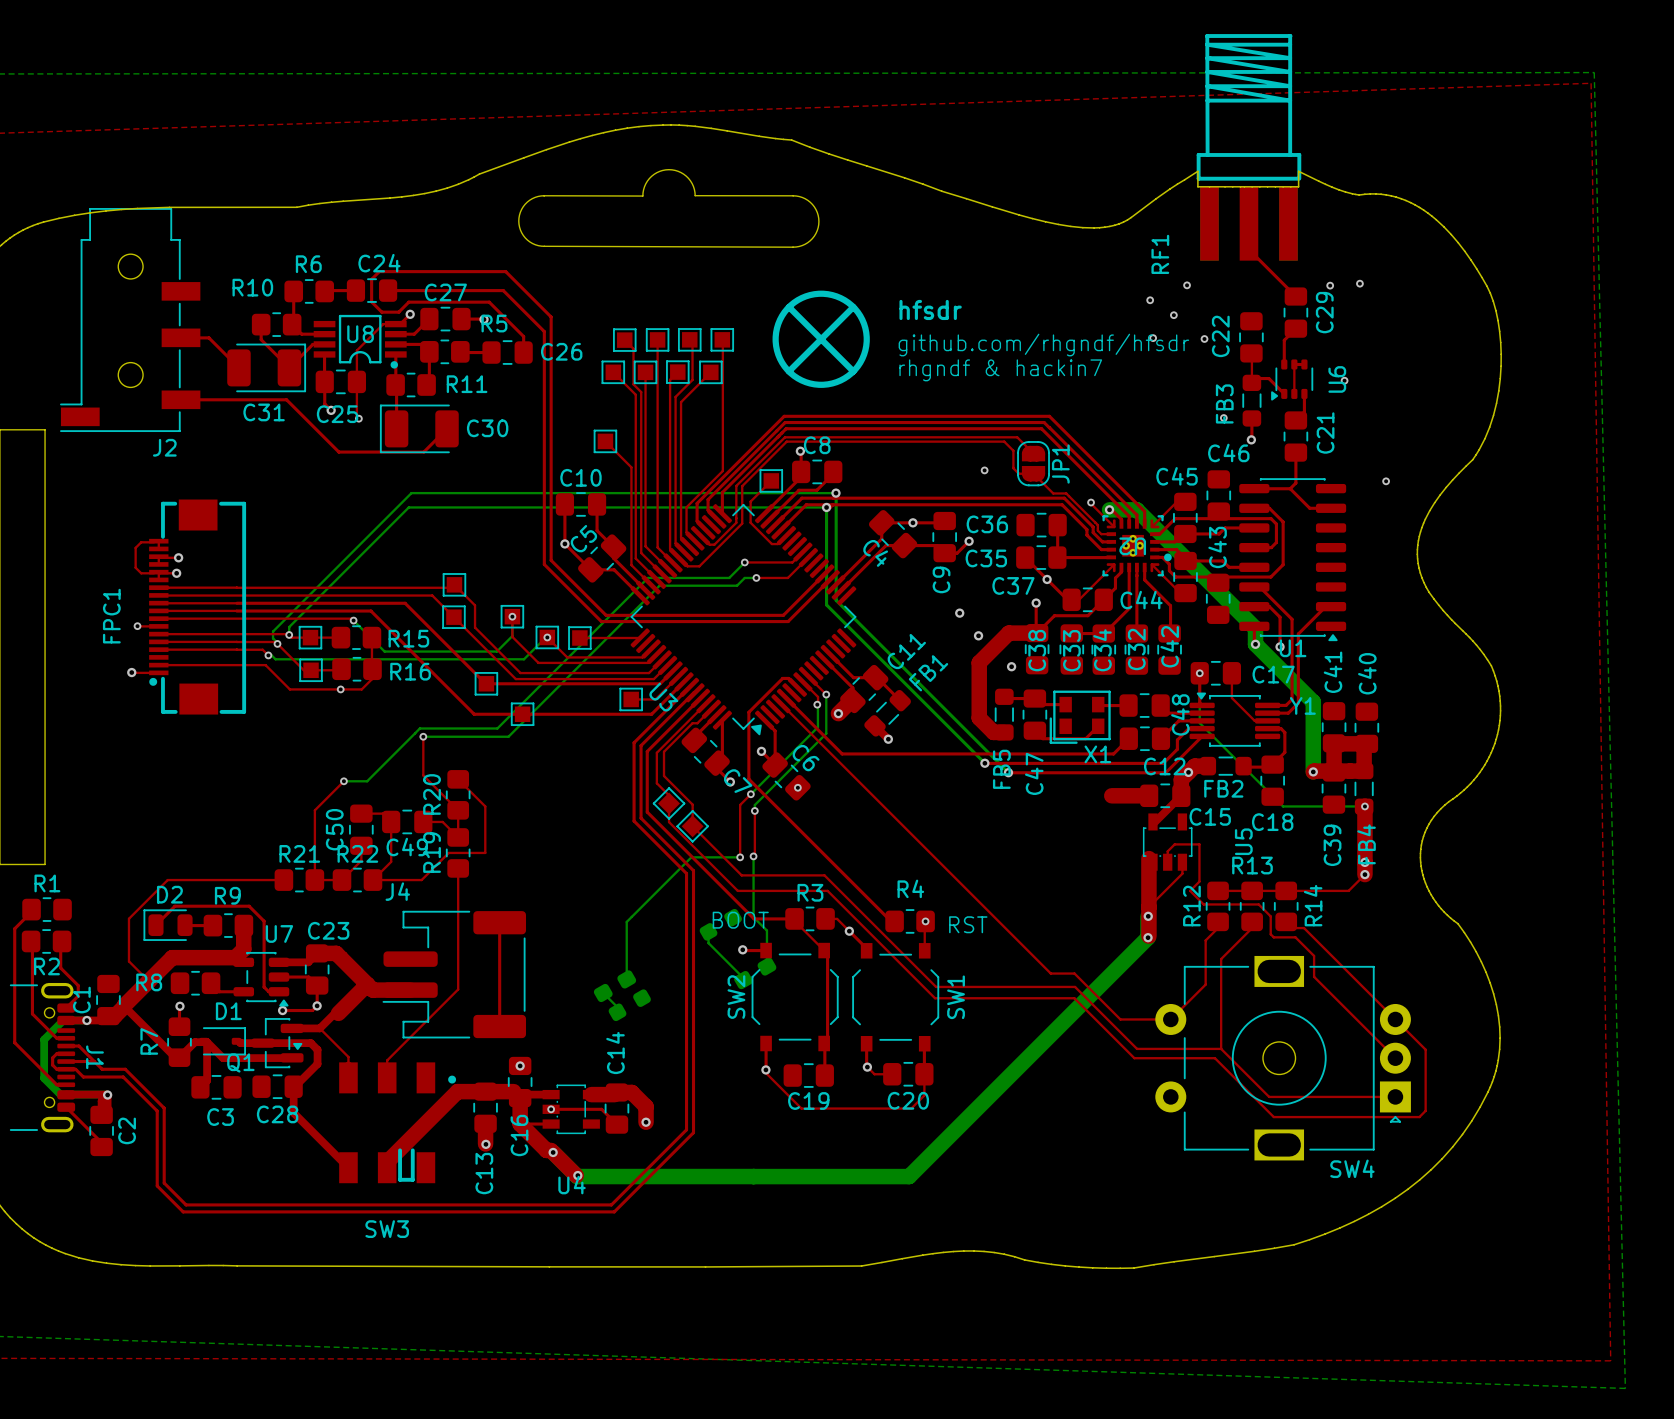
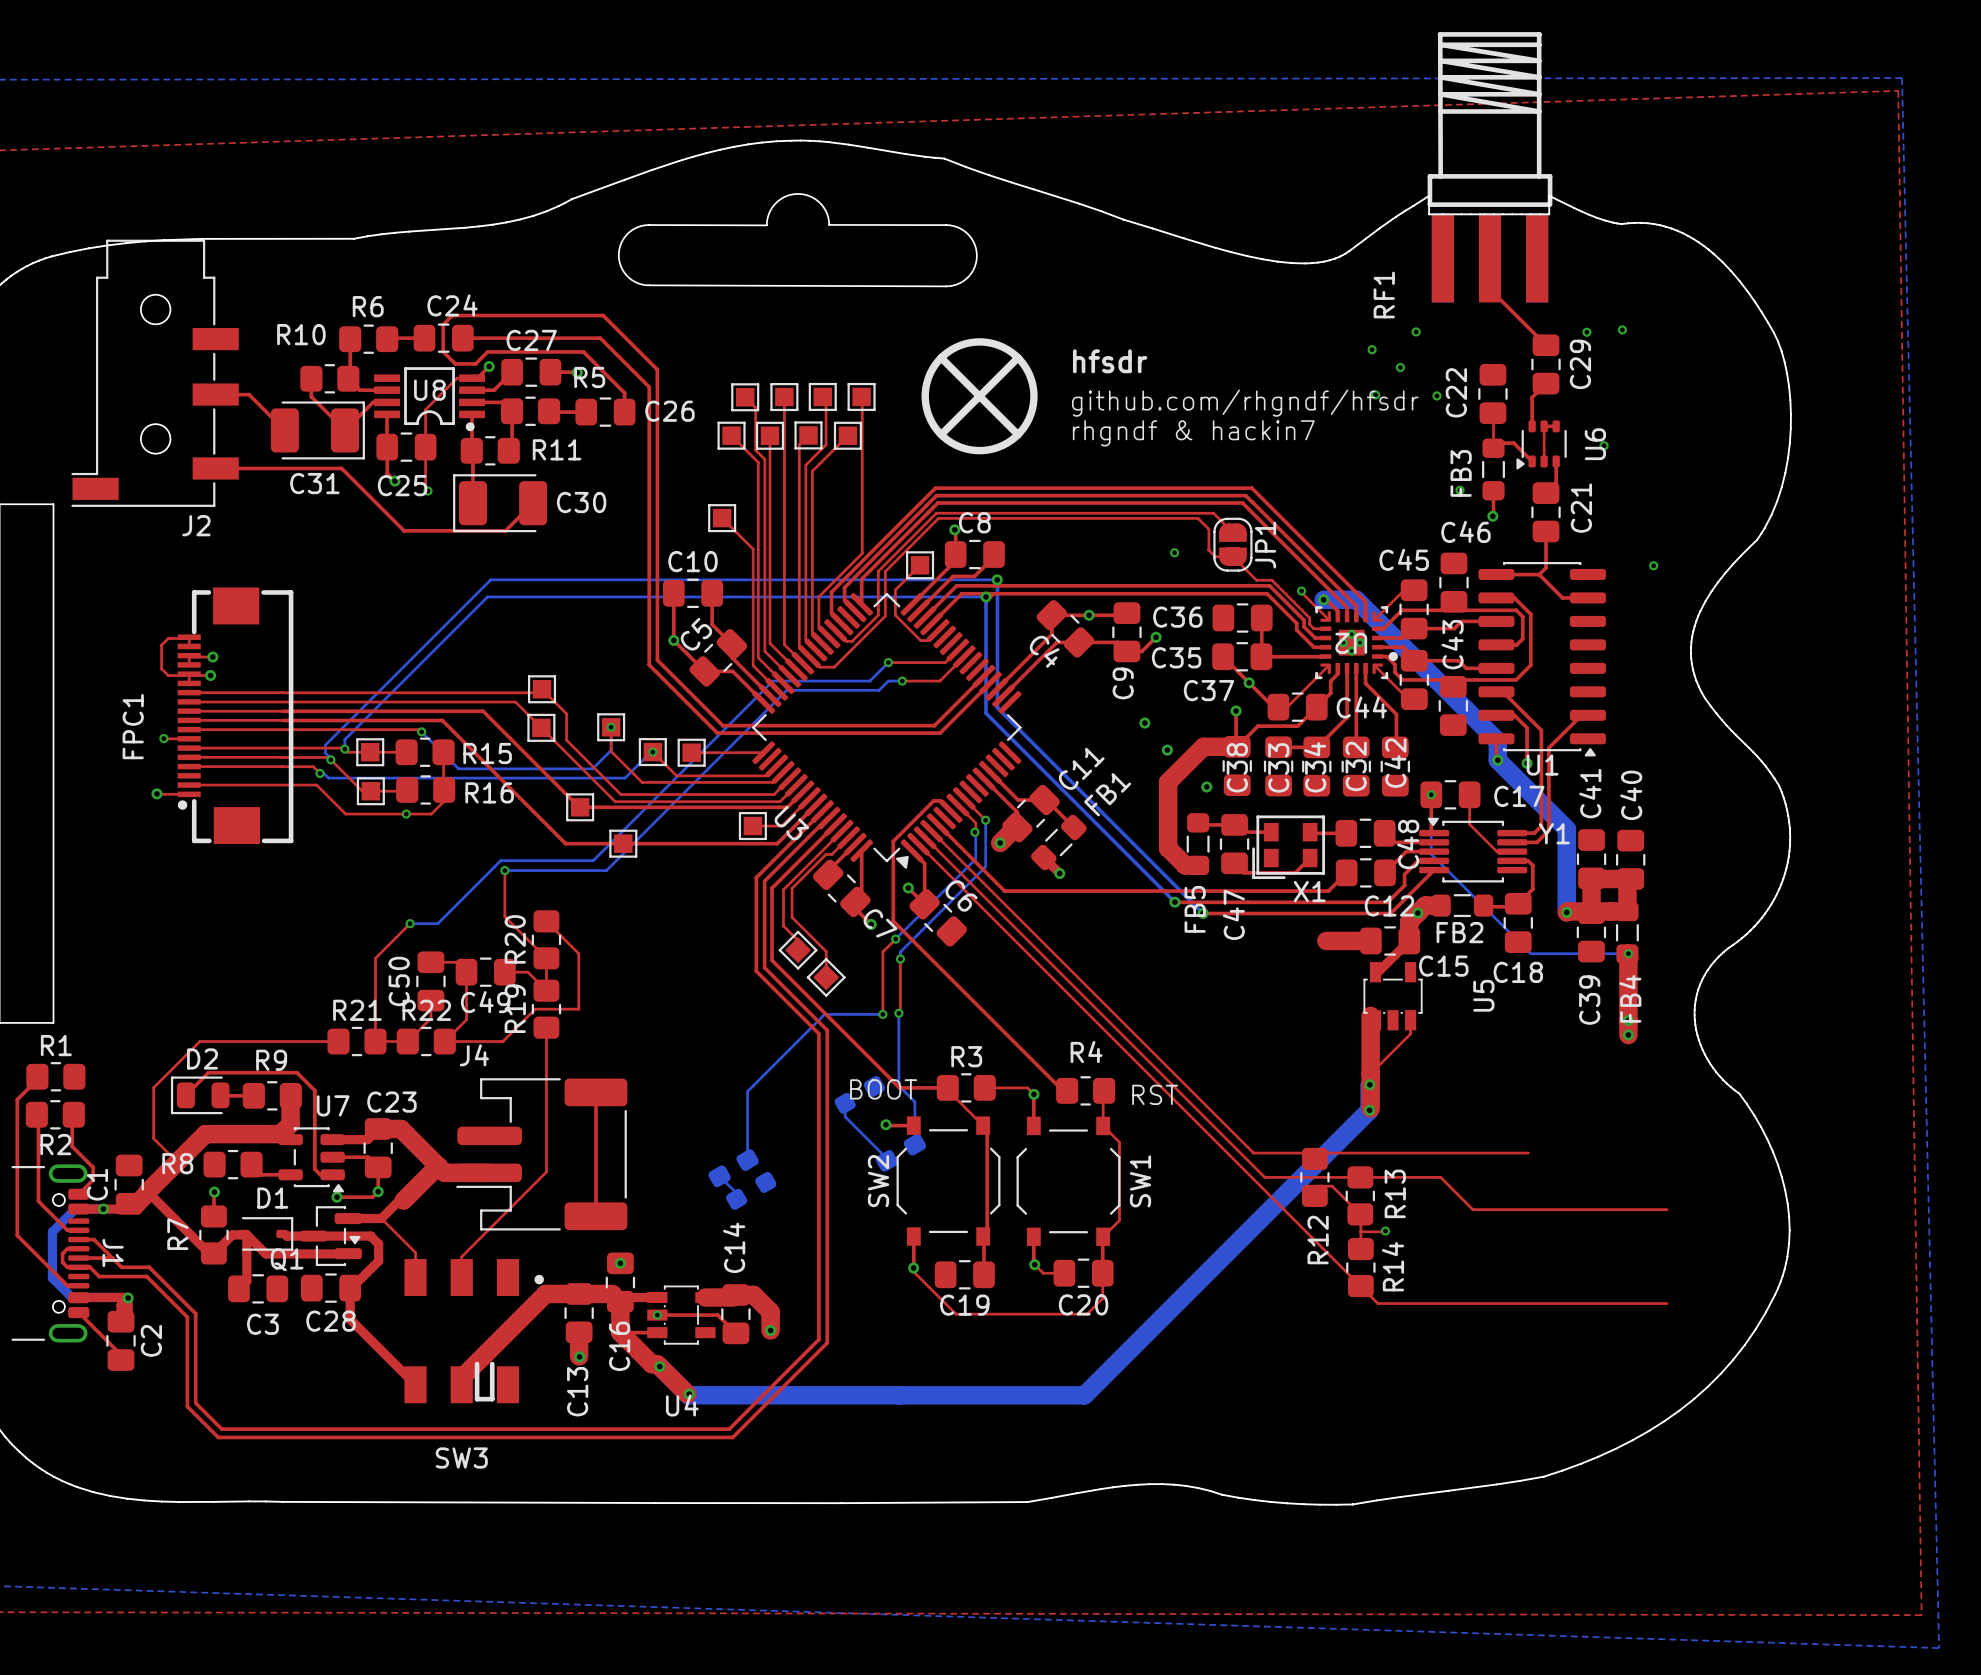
top track: none -> (925, 837) (1264, 1177) (1440, 1177) (1472, 1209) (1667, 1209)
top track: none -> (918, 844) (1377, 1303) (1667, 1303)
via: (797, 787) -> none
top track: (669, 803) (669, 822) (737, 890) (827, 890) (935, 998) (1074, 998) (1134, 1058) (1214, 1058) (1273, 1117) (1419, 1117) (1425, 1110) (1425, 1049) (1304, 928) (1286, 928) -> none
top track: (692, 826) (741, 875) (824, 875) (936, 986) (1075, 986) (1137, 1048) (1221, 1048) -> none
top track: (1167, 862) (1167, 851) (1174, 844) (1199, 844) (1199, 881) (1190, 890) (1203, 904) (1258, 904) (1270, 916) (1270, 934) (1273, 937) (1295, 937) (1314, 955) (1314, 976) (1395, 1058) -> none
R13 name rotation: 0° (1252, 865) -> 90° counterclockwise (1395, 1193)
top track: (1364, 874) (1348, 890) (1218, 890) -> none
R12 name position: R12 (1191, 906) -> R12 (1318, 1240)
R12 position: (1218, 906) -> (1314, 1177)
R13 position: (1252, 906) -> (1360, 1195)
R14 position: (1286, 906) -> (1360, 1267)
top track: (837, 918) (866, 948) -> (998, 1087) (1027, 1087) (1033, 1094)
via: (925, 921) -> none
top track: none -> (1033, 1094) (1033, 1123)
top track: (1218, 928) (1205, 940) (1205, 984) (1170, 1019) (1120, 1019) (1074, 973) -> (1528, 1153) (1281, 1153)
top track: (1252, 928) (1221, 959) (1221, 1048) -> none
via position: (849, 931) -> (1033, 1094)
top track: none -> (1103, 1125) (1119, 1142) (1119, 1220) (1103, 1236)
top track: none -> (1315, 1186) (1332, 1186) (1360, 1214) (1360, 1249)
top track: none -> (1385, 1231) (1360, 1231)
via: none -> (1385, 1231)
top track: (1221, 1048) (1269, 1096) (1395, 1096) -> none
SW4: (1283, 1058) -> none

